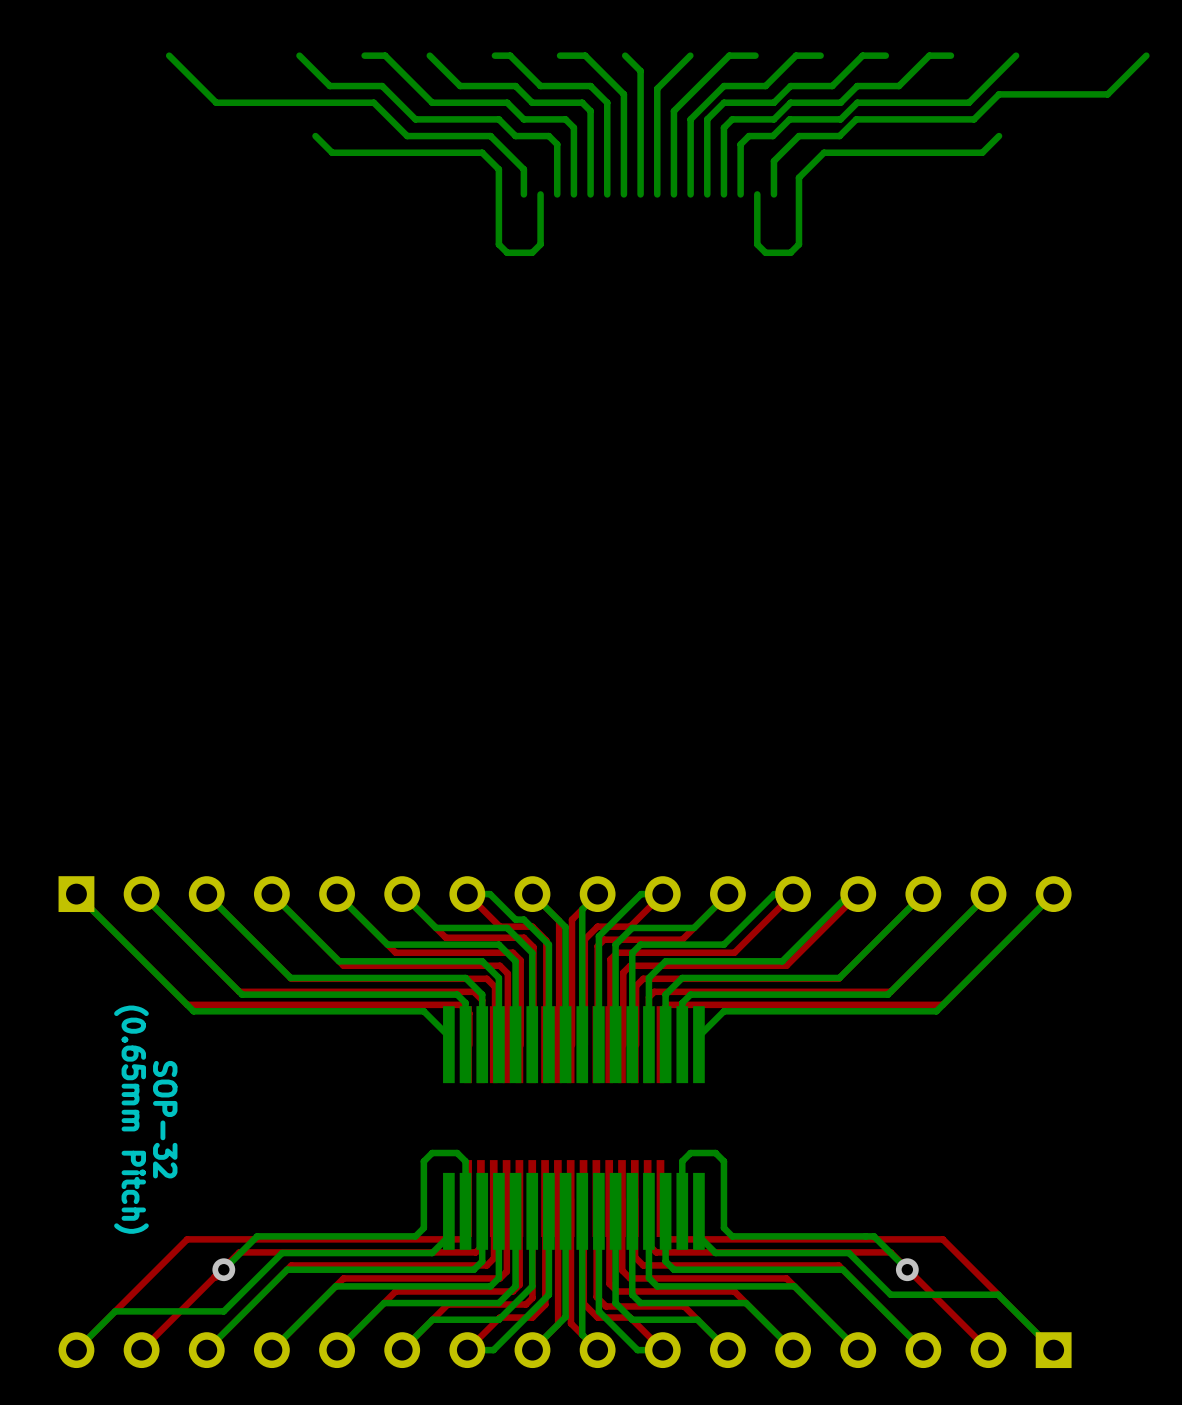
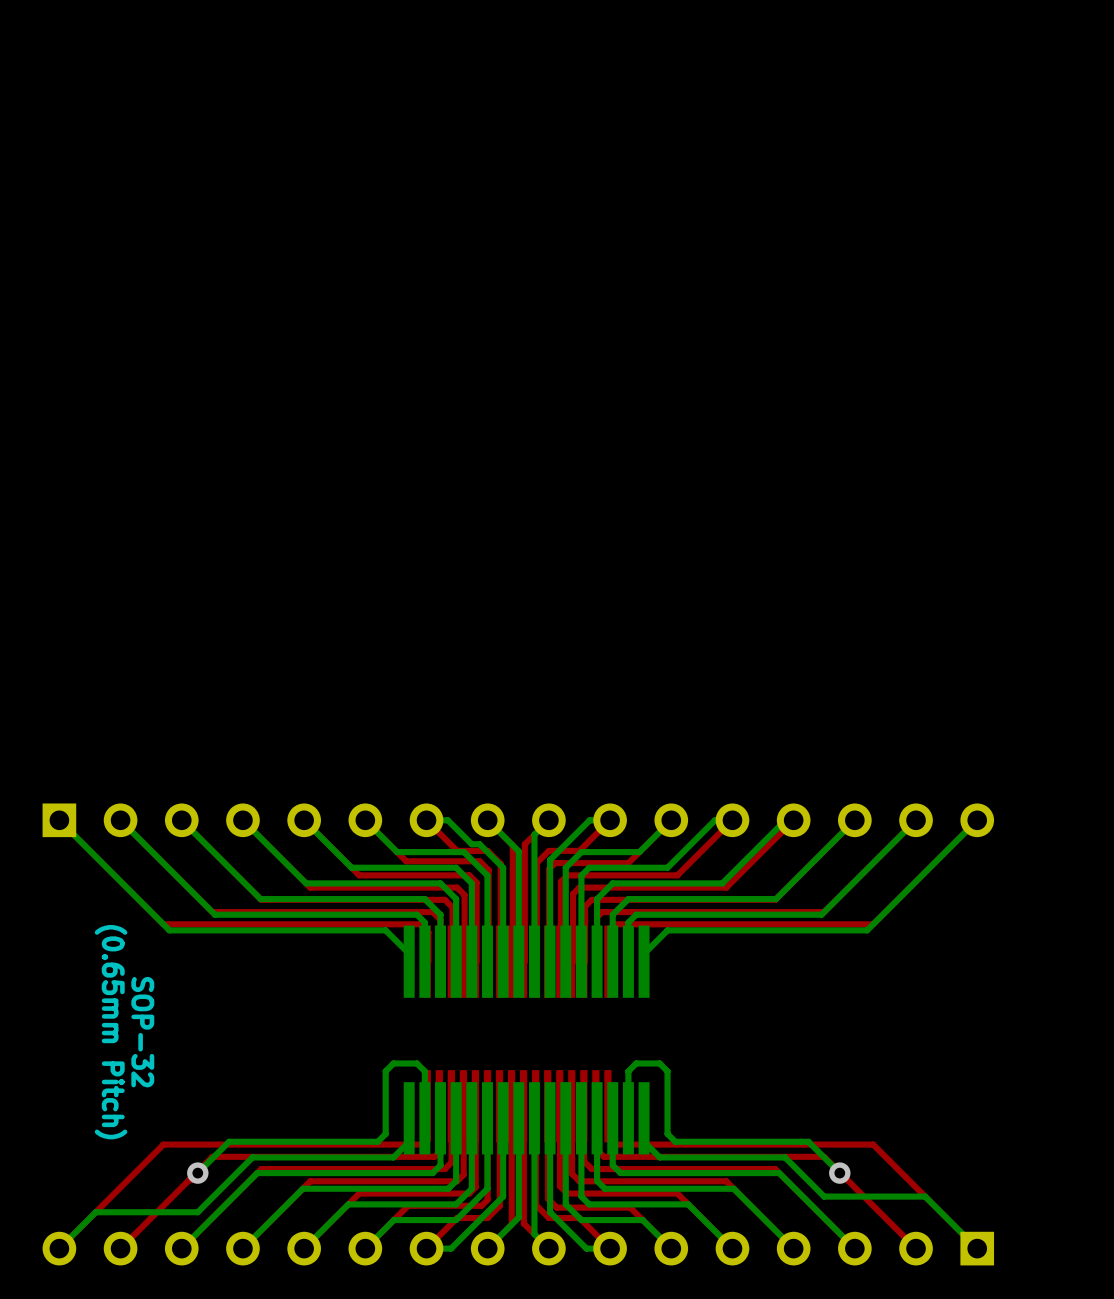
bottom track: (169, 55) (216, 102) (373, 102) (407, 136) (490, 136) (523, 169) (523, 194) -> none
bottom track: (299, 55) (329, 86) (382, 86) (415, 119) (498, 119) (515, 136) (548, 136) (557, 144) (557, 194) -> none
bottom track: (364, 55) (385, 55) (432, 102) (507, 102) (523, 119) (565, 119) (573, 127) (573, 194) -> none
bottom track: (429, 55) (460, 86) (515, 86) (532, 102) (582, 102) (590, 111) (590, 194) -> none
bottom track: (494, 55) (510, 55) (540, 86) (590, 86) (607, 102) (607, 194) -> none
bottom track: (560, 55) (585, 55) (623, 94) (623, 194) -> none
bottom track: (625, 55) (640, 71) (640, 194) -> none
bottom track: (690, 55) (657, 88) (657, 194) -> none
bottom track: (755, 55) (729, 55) (673, 111) (673, 194) -> none
bottom track: (820, 55) (796, 55) (765, 86) (723, 86) (690, 119) (690, 194) -> none
bottom track: (885, 55) (862, 55) (832, 86) (790, 86) (773, 102) (723, 102) (707, 119) (707, 194) -> none
bottom track: (950, 55) (929, 55) (899, 86) (857, 86) (840, 102) (790, 102) (773, 119) (732, 119) (723, 127) (723, 194) -> none
bottom track: (1016, 55) (969, 102) (857, 102) (840, 119) (789, 119) (772, 136) (748, 136) (740, 144) (740, 194) -> none
bottom track: (1146, 55) (1107, 94) (999, 94) (974, 119) (856, 119) (839, 136) (798, 136) (773, 161) (773, 194) -> none
bottom track: (315, 136) (332, 152) (482, 152) (498, 169) (498, 244) (507, 252) (532, 252) (540, 244) (540, 194) -> none
bottom track: (999, 136) (982, 152) (823, 152) (798, 177) (798, 244) (790, 252) (765, 252) (757, 244) (757, 194) -> none

